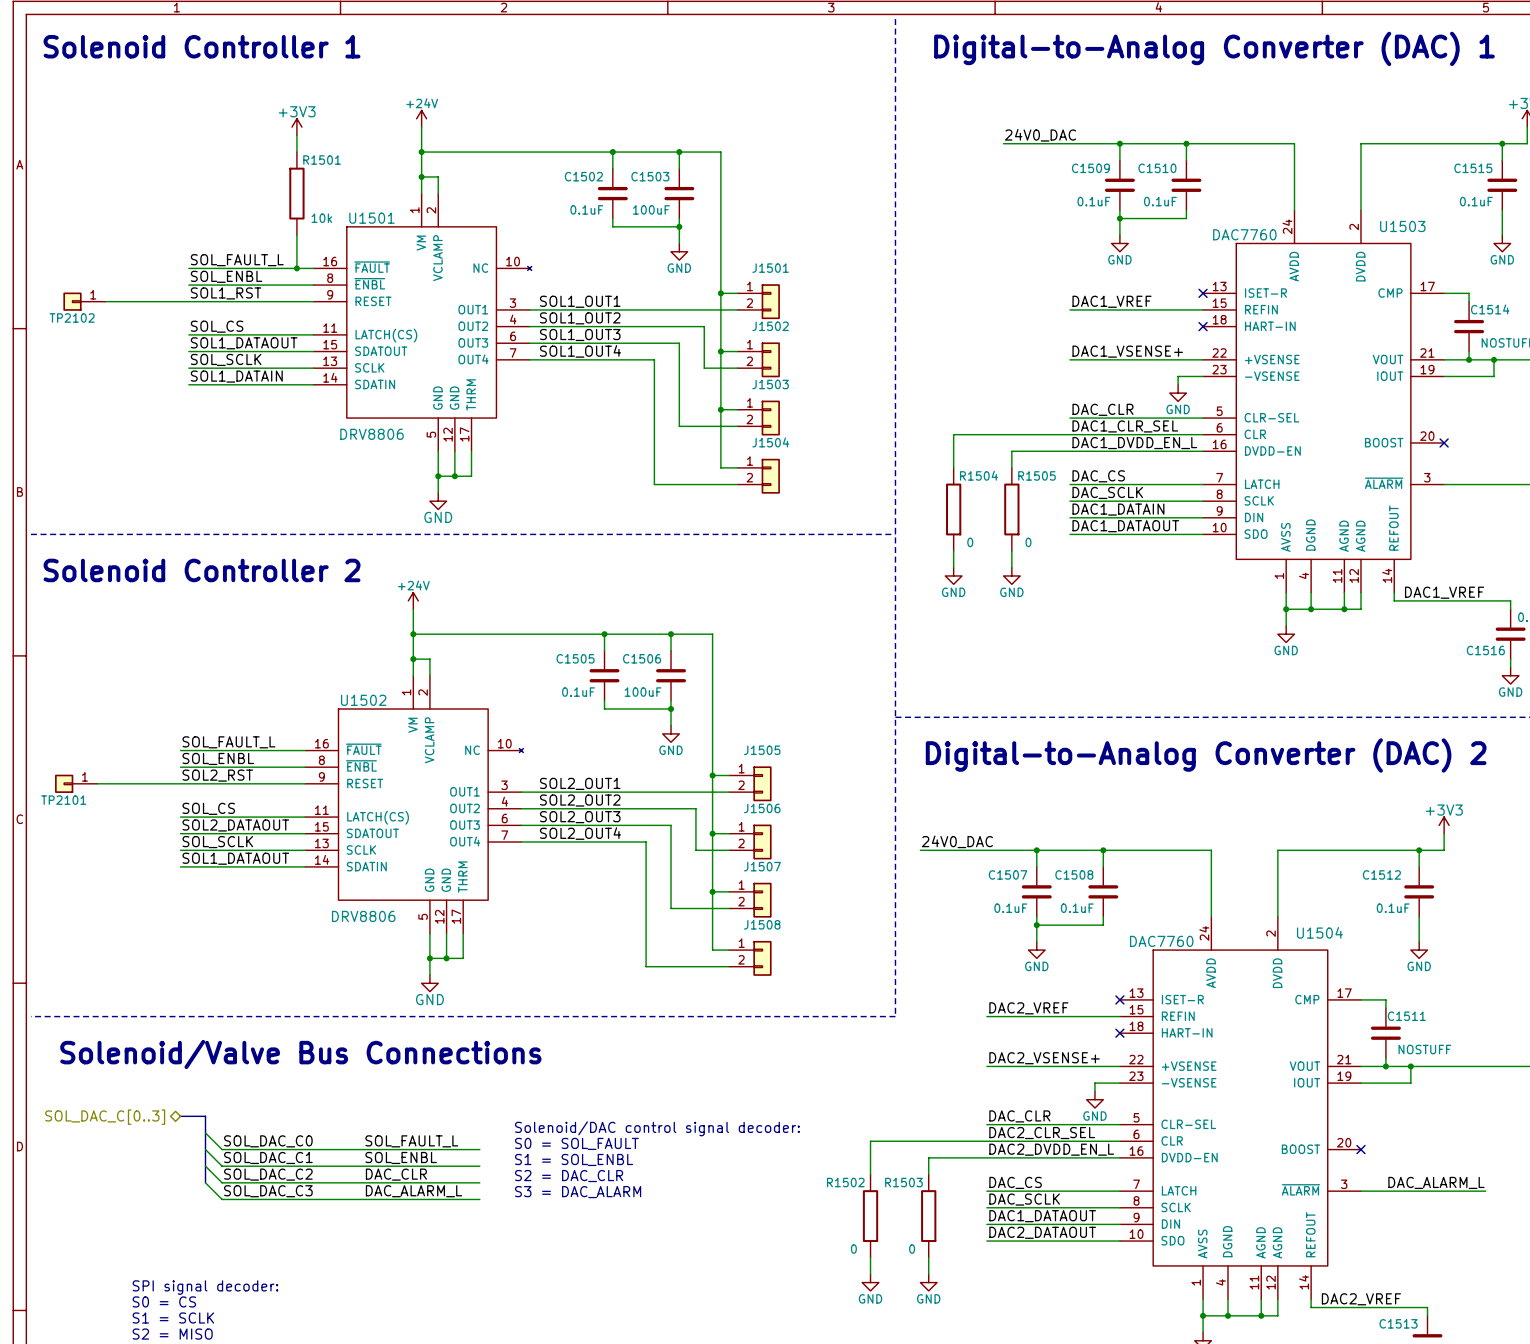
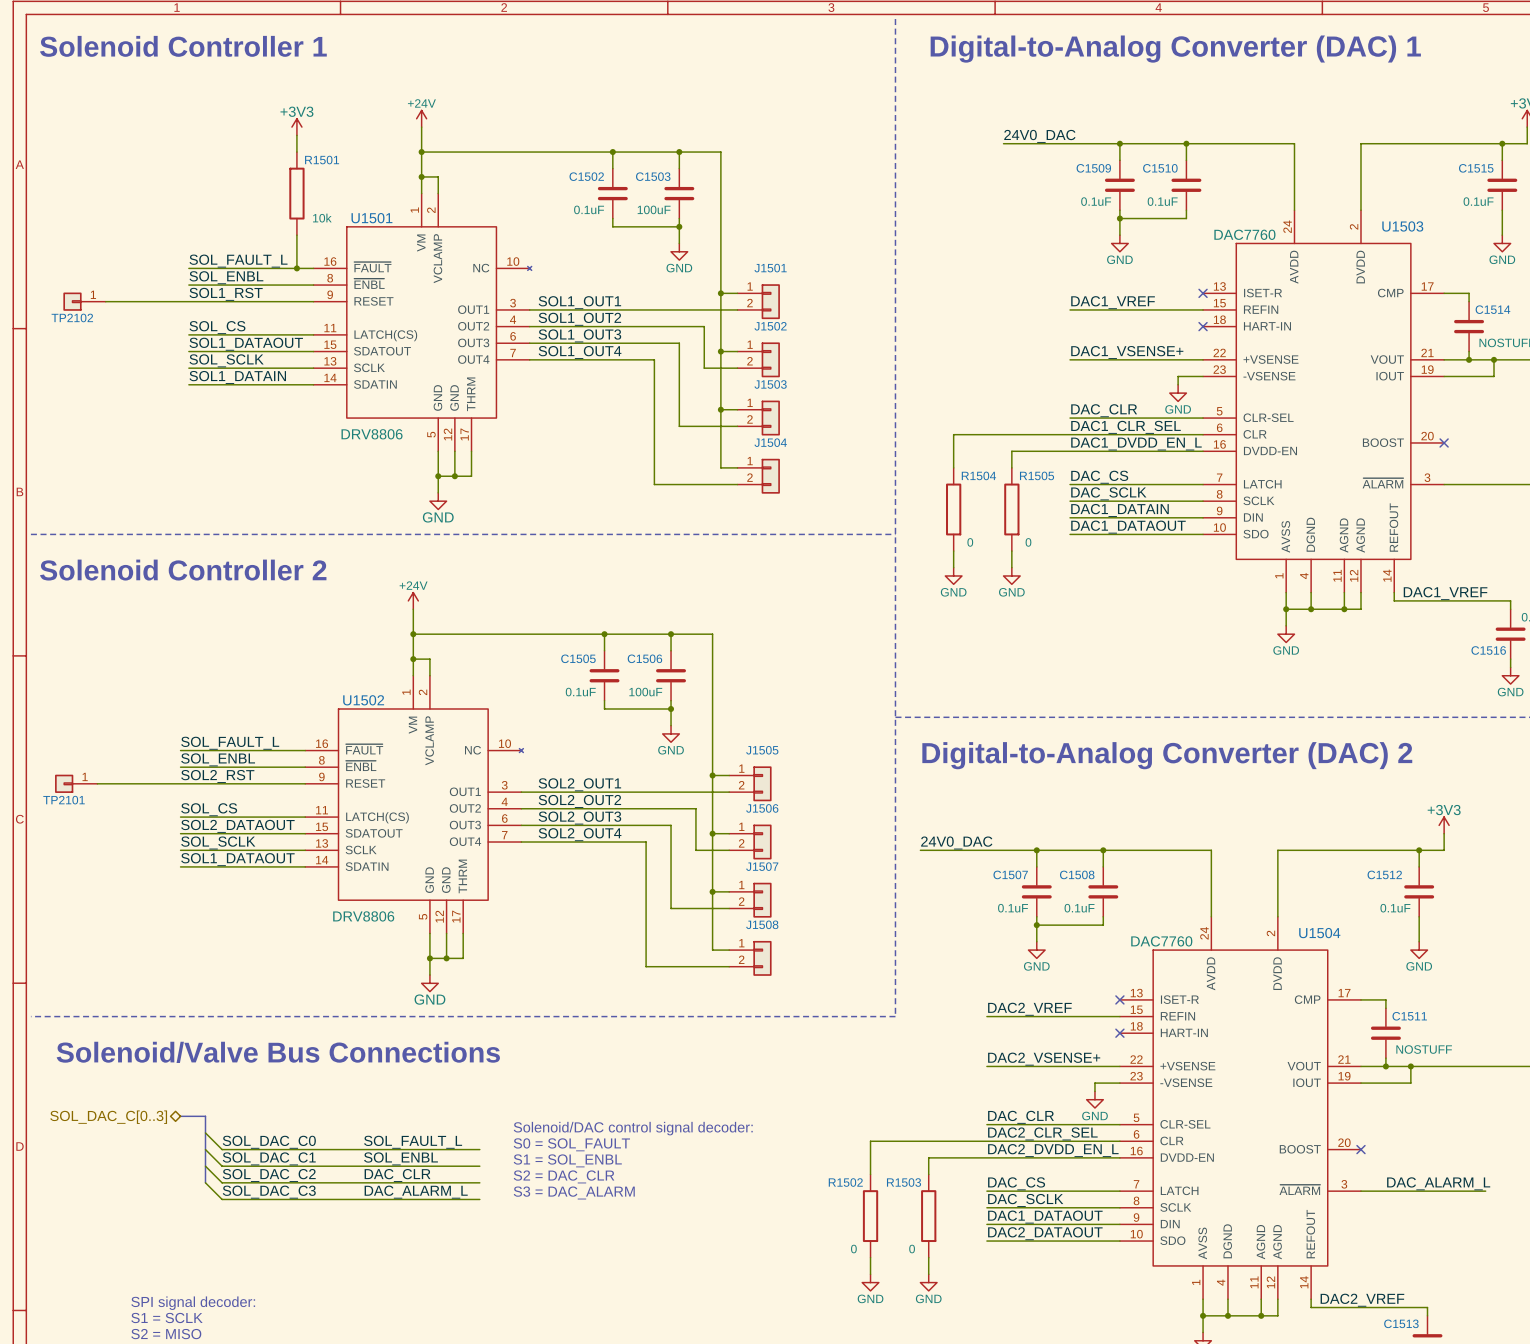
text: SPI signal decoder: (205, 1287) -> none
text: S0 = CS (164, 1301) -> SPI signal decoder: (193, 1303)

